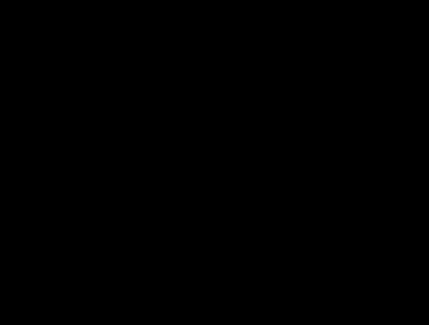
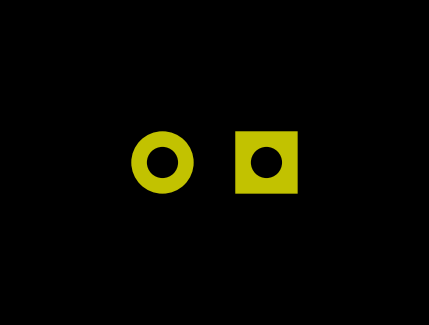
part: none -> (214, 162)

